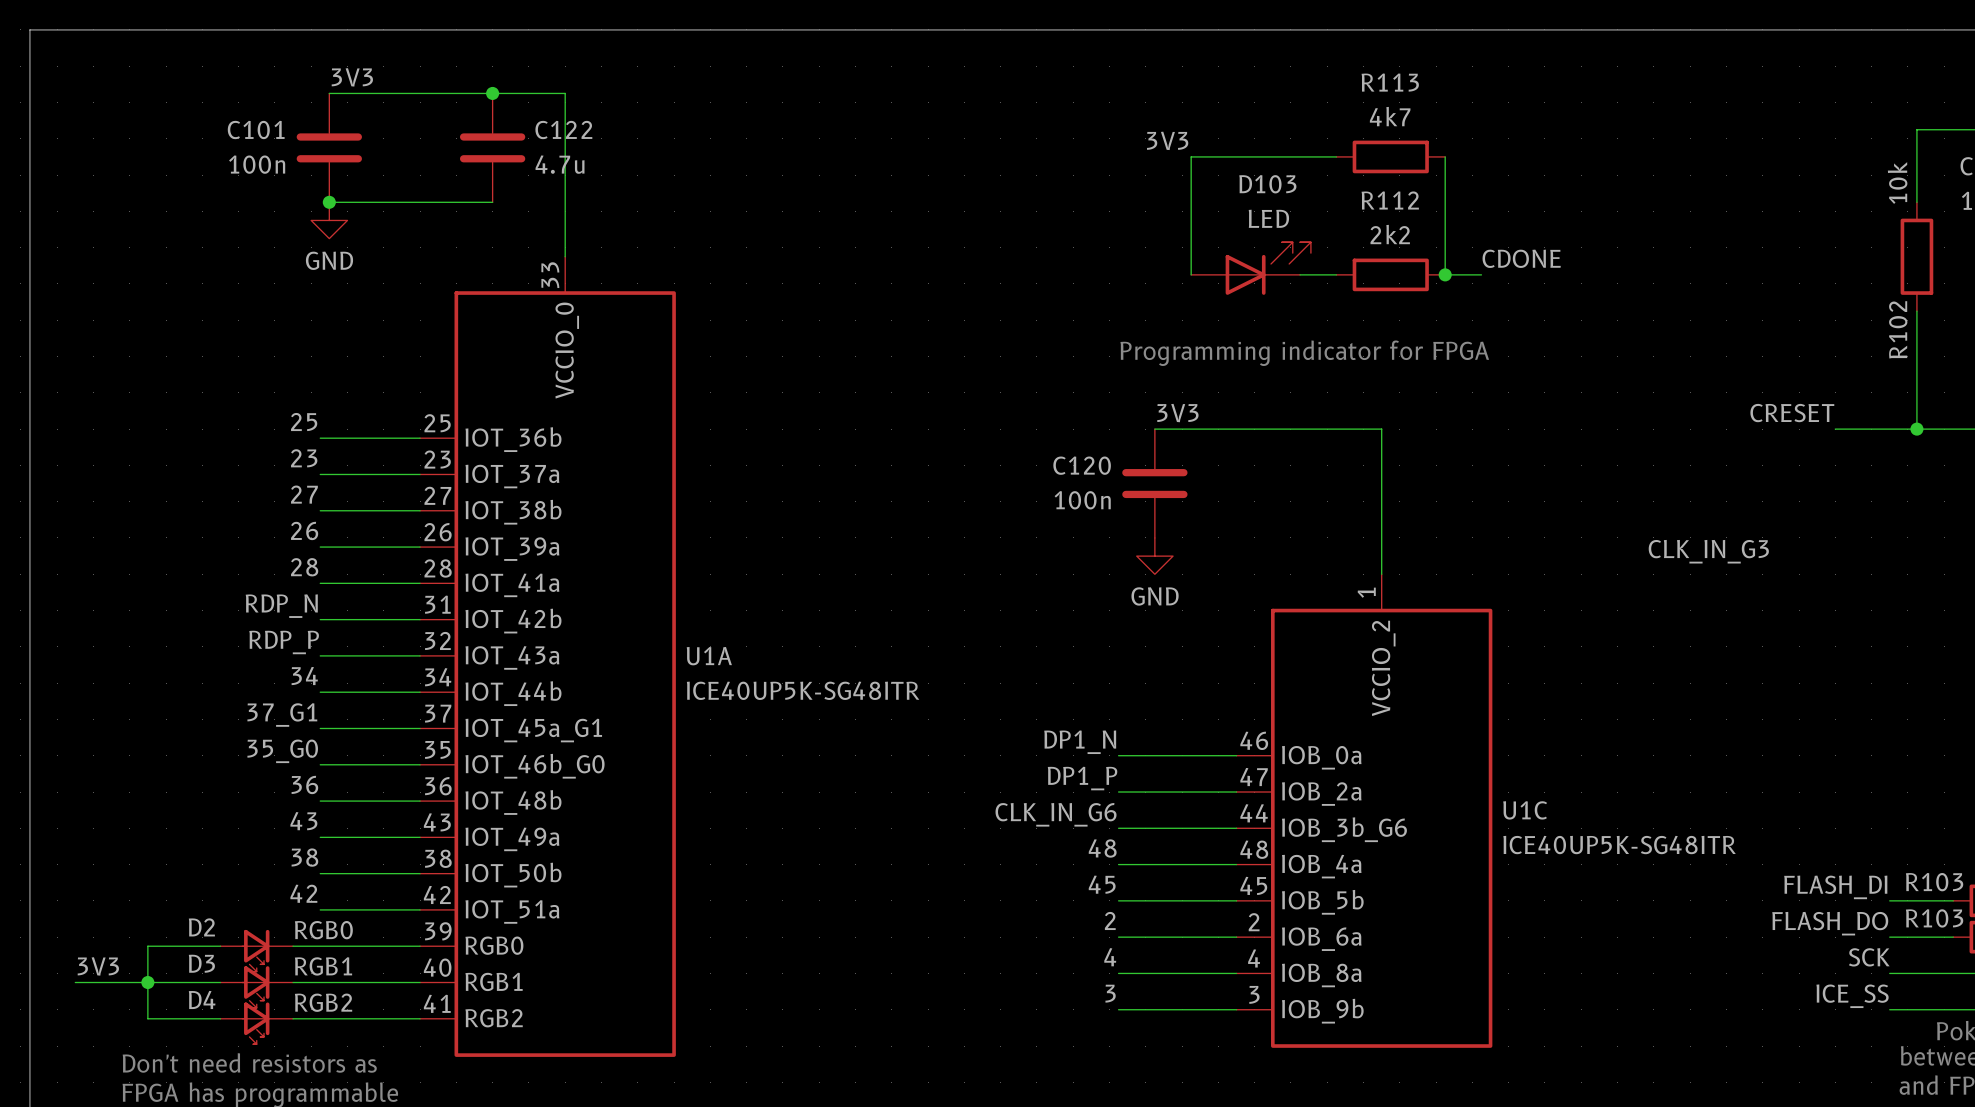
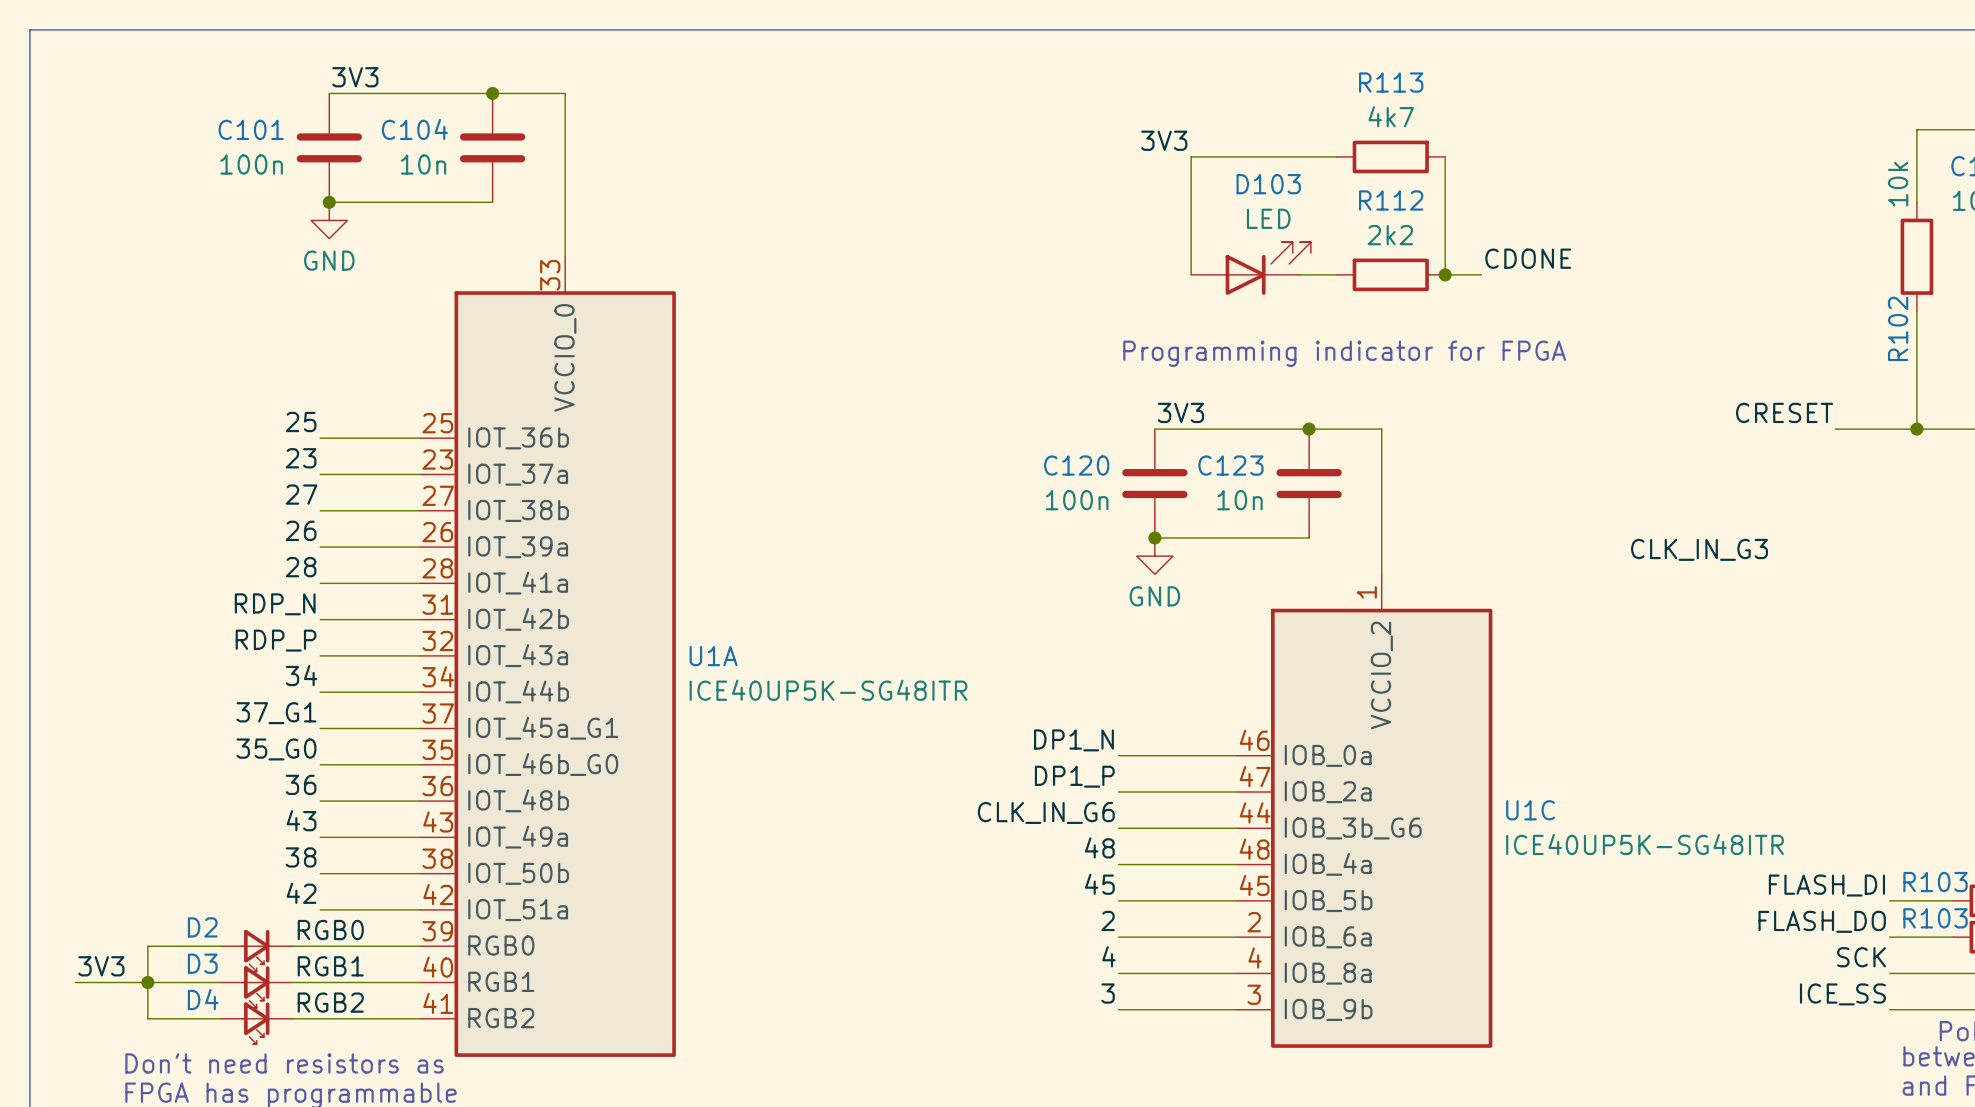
C122 name: C122 (563, 129) -> C104 (414, 129)
C122 value: 4.7u (560, 164) -> 10n (423, 164)
junction: none -> (1309, 429)
C123: none -> 10n (1309, 483)
wire: none -> (1154, 537) (1309, 537)
junction: none -> (1154, 537)

